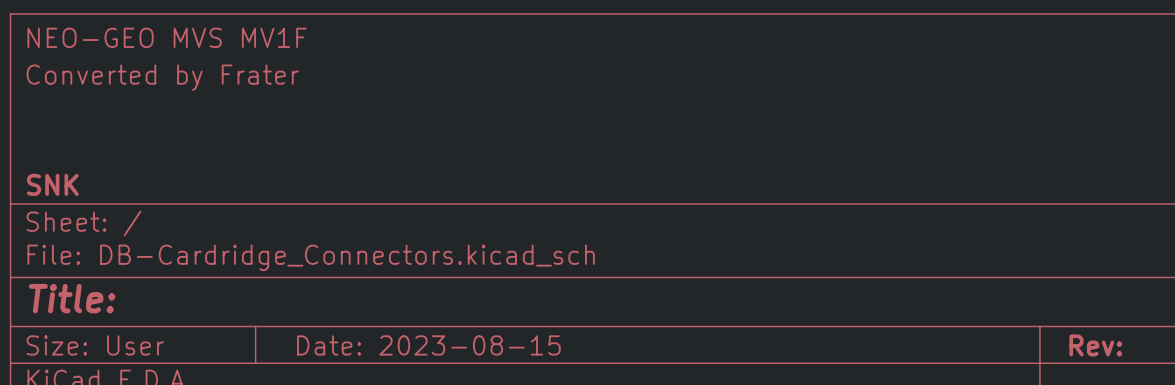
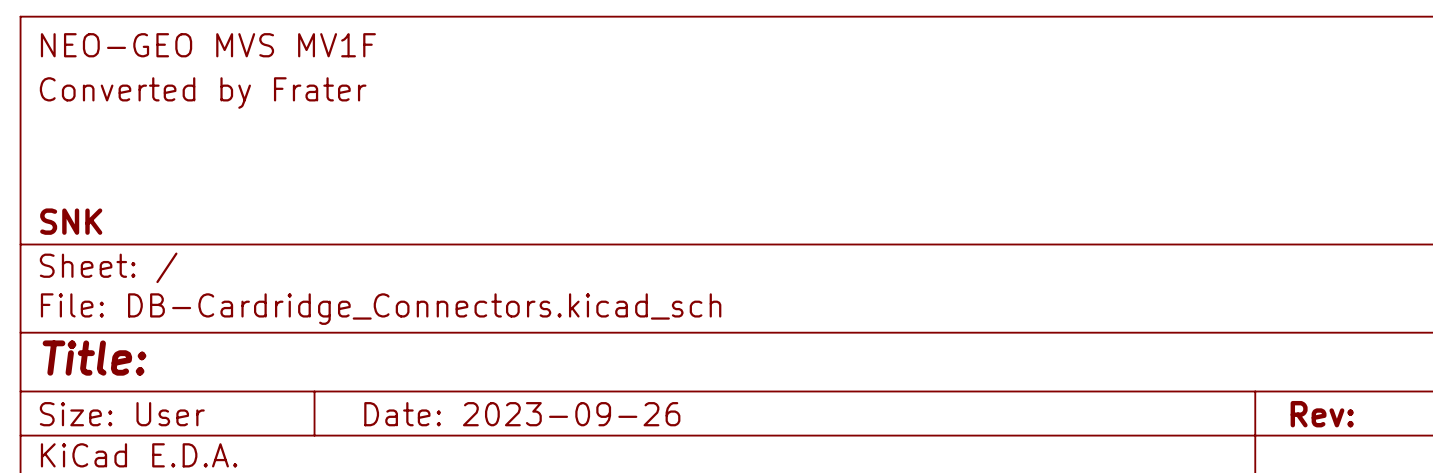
title block: Date: 2023-08-15 (428, 345) -> Date: 2023-09-26 (522, 414)

